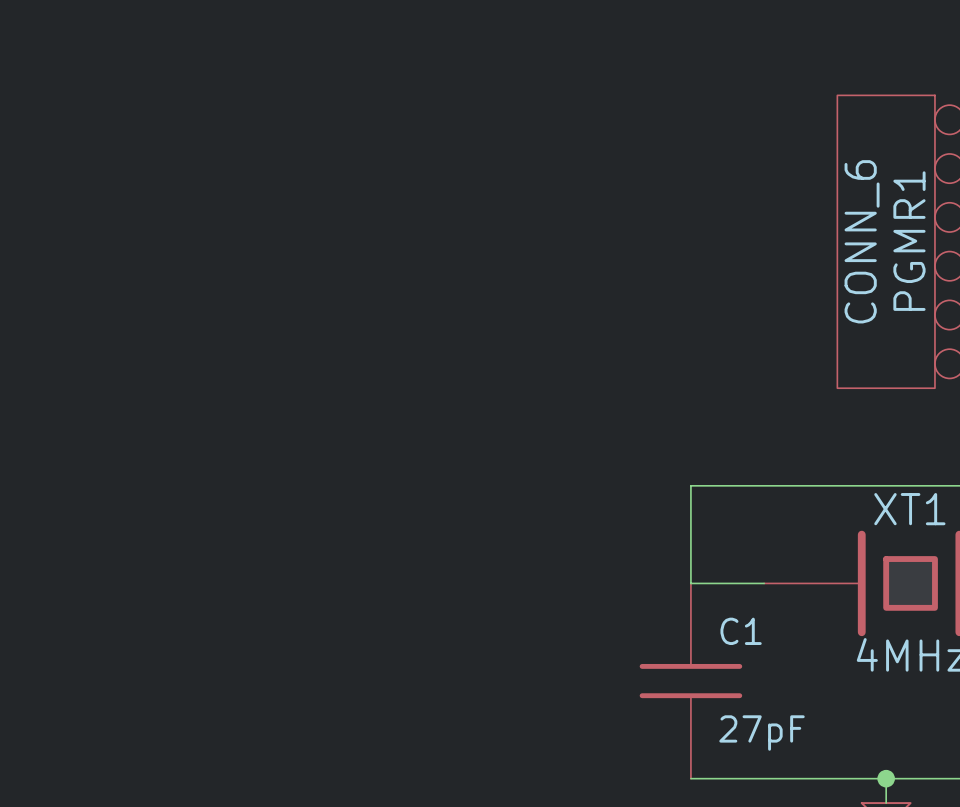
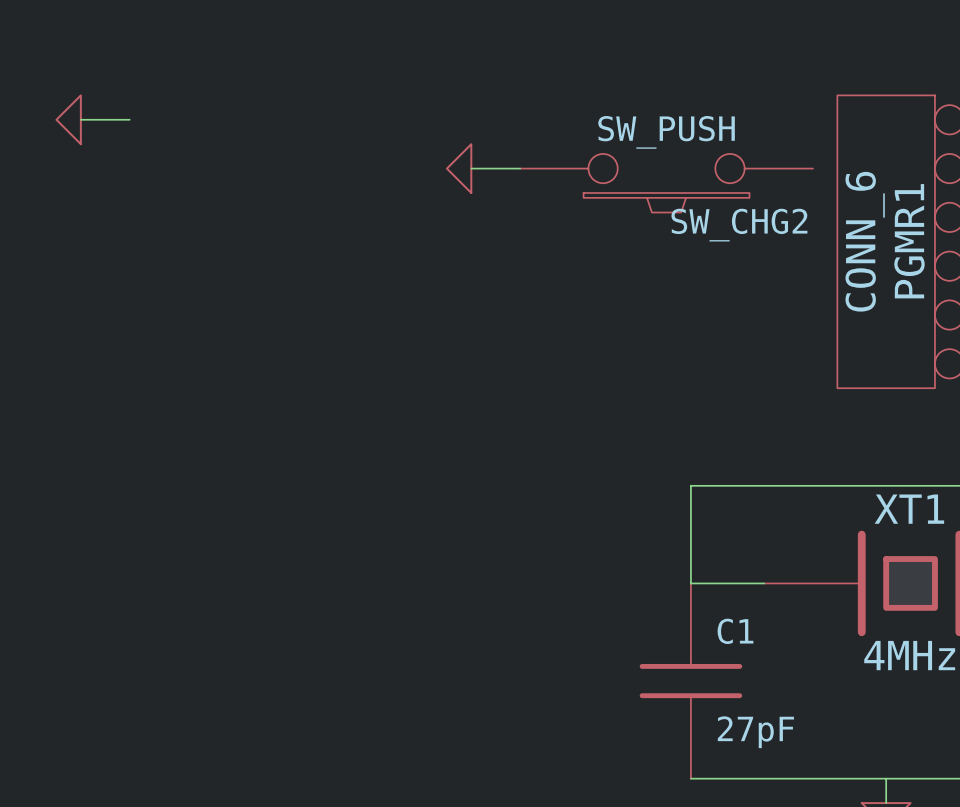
power symbol: none -> (68, 119)
wire: none -> (80, 119) (129, 119)
power symbol: none -> (459, 168)
wire: none -> (471, 168) (520, 168)
SW_CHG2: none -> SW_PUSH (666, 183)
junction: (886, 778) -> none

